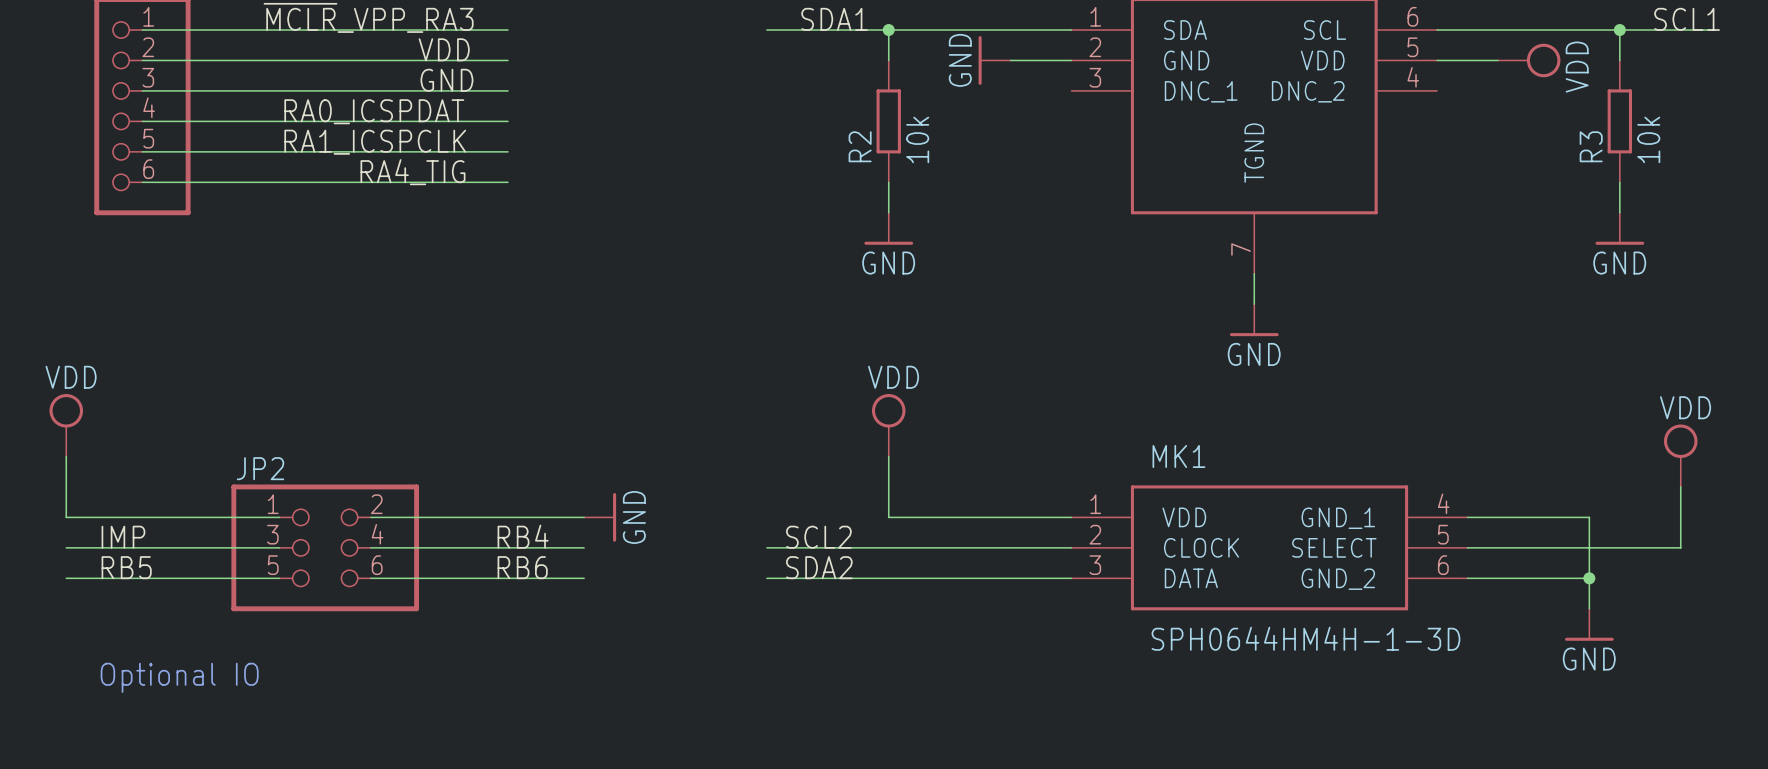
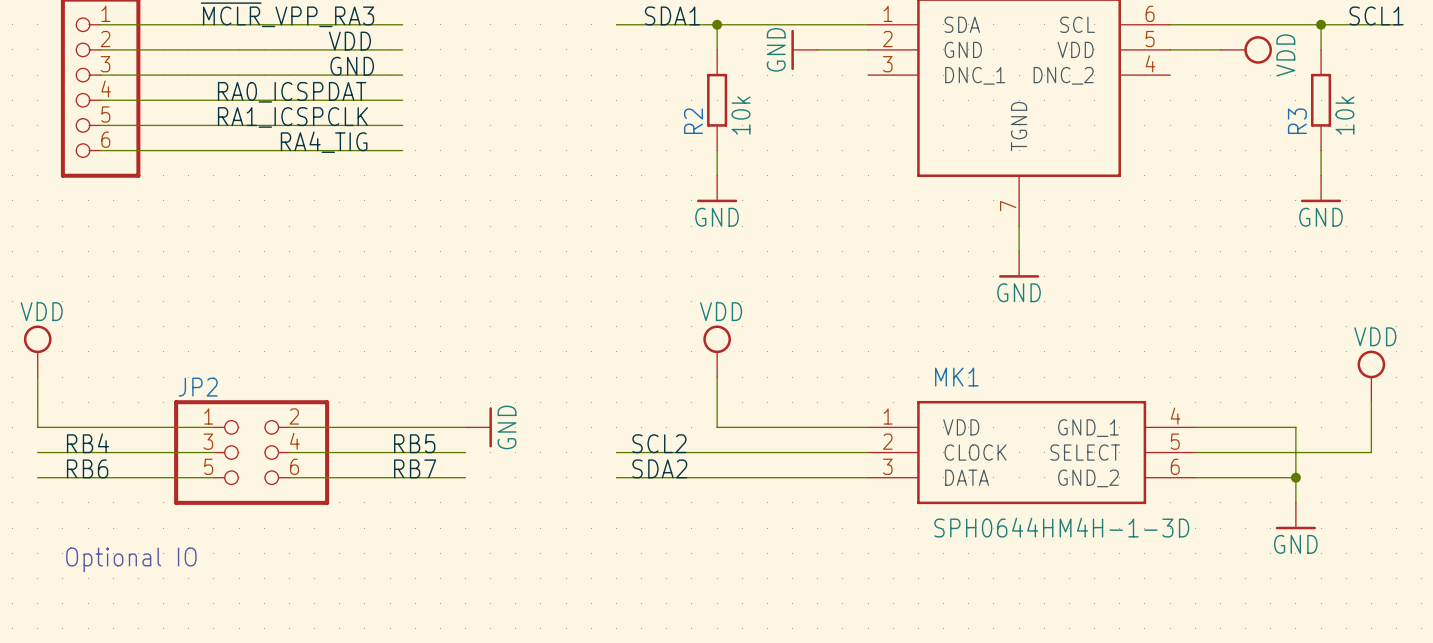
label: RB4 (523, 536) -> RB5 (414, 443)
label: IMP (123, 537) -> RB4 (87, 443)
label: RB5 (126, 567) -> RB6 (87, 468)
label: RB6 (522, 567) -> RB7 (415, 468)

